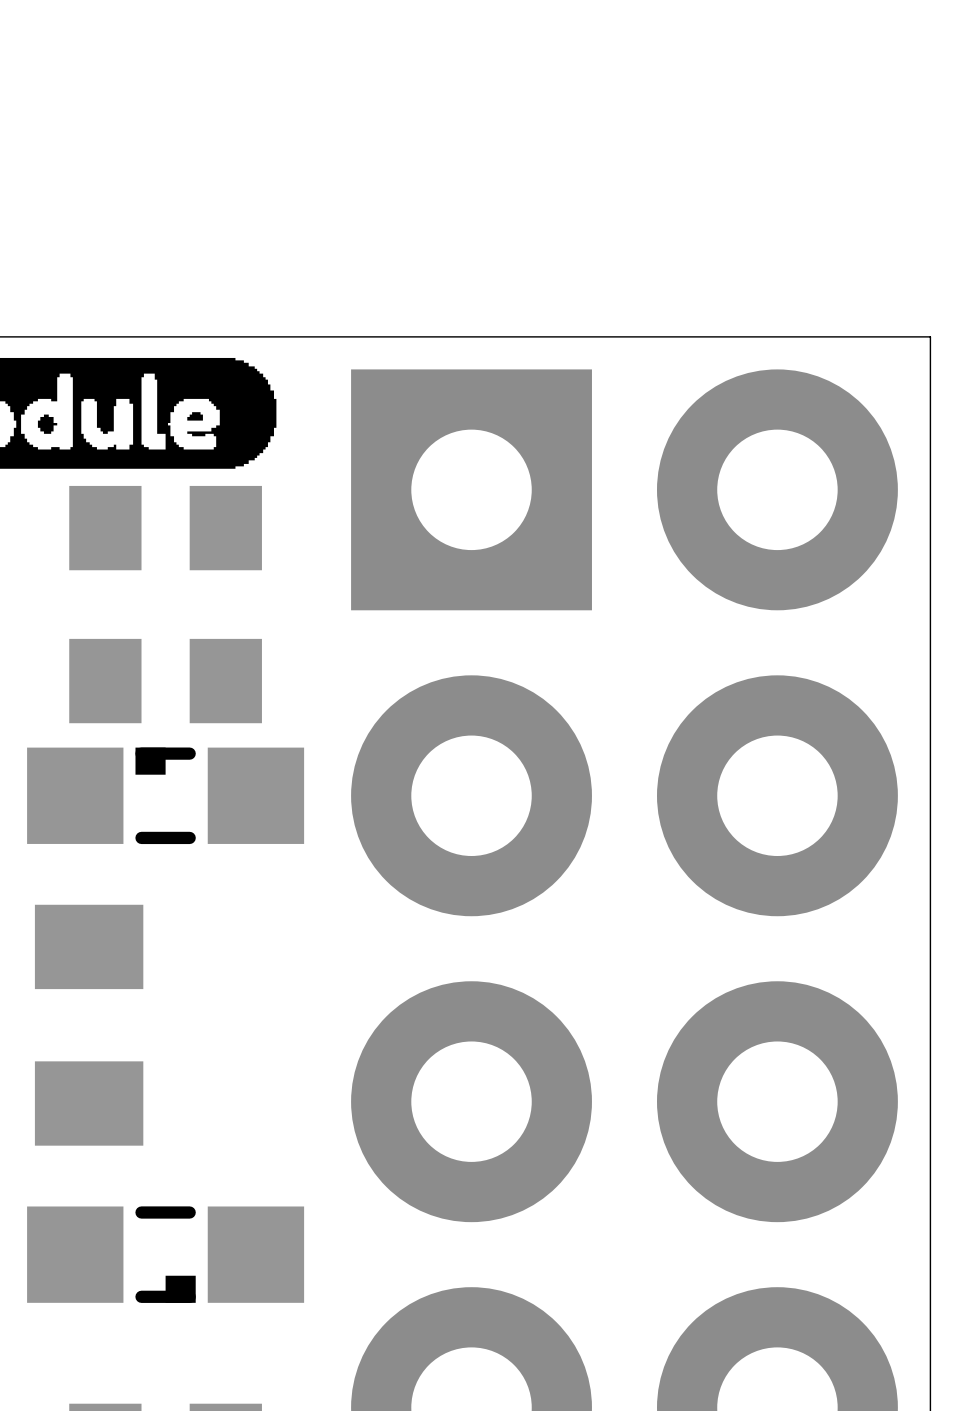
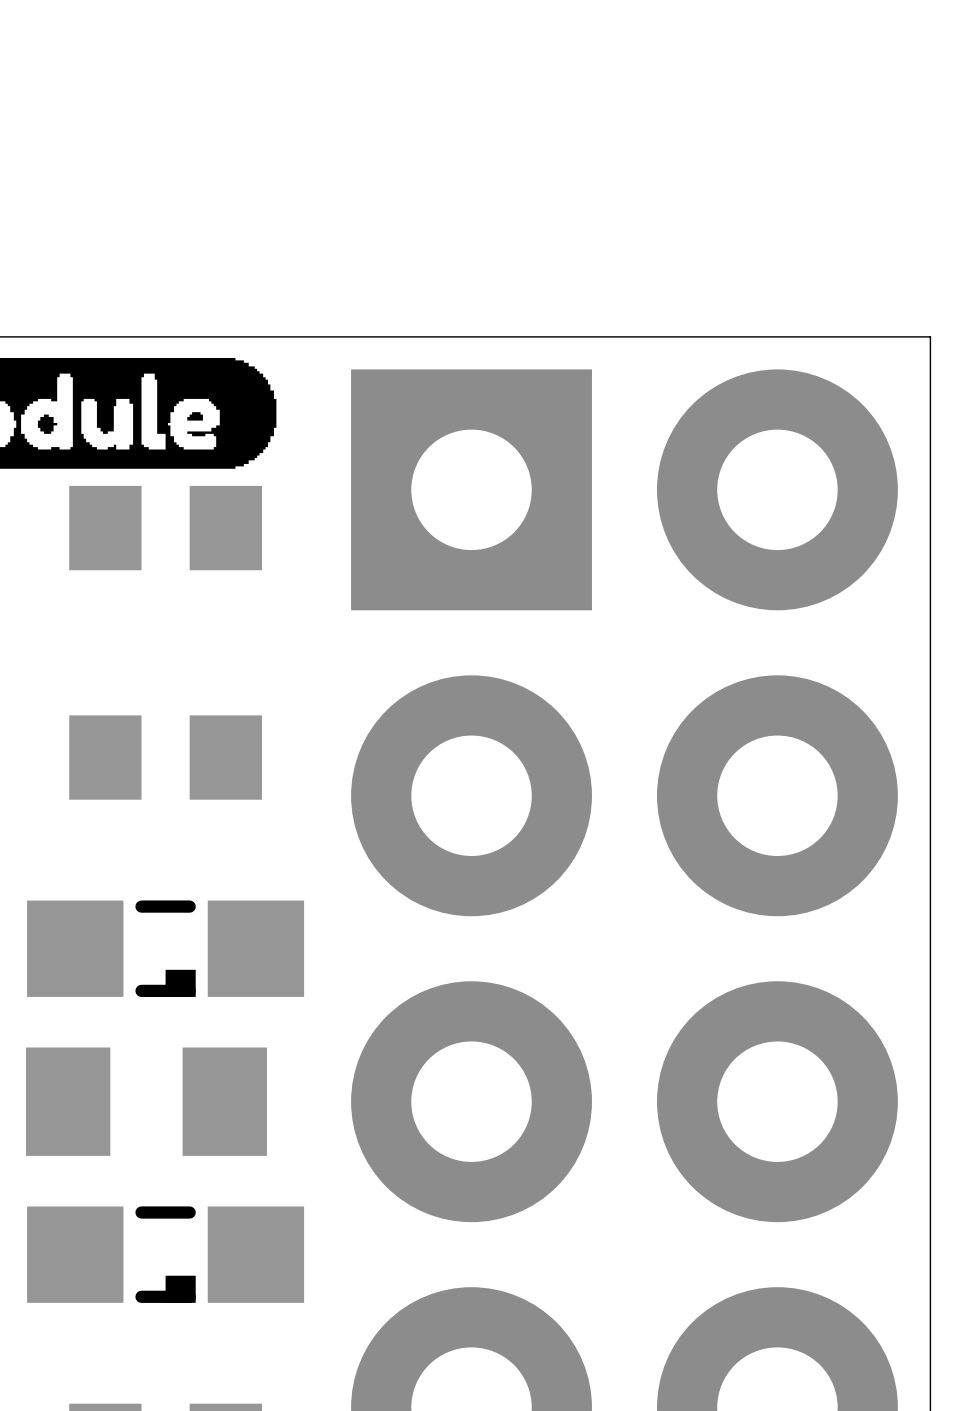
part position: (165, 681) -> (165, 757)
part rotation: 0° (165, 795) -> 180° (165, 948)
part rotation: 0° (89, 1025) -> 90° clockwise (146, 1101)

